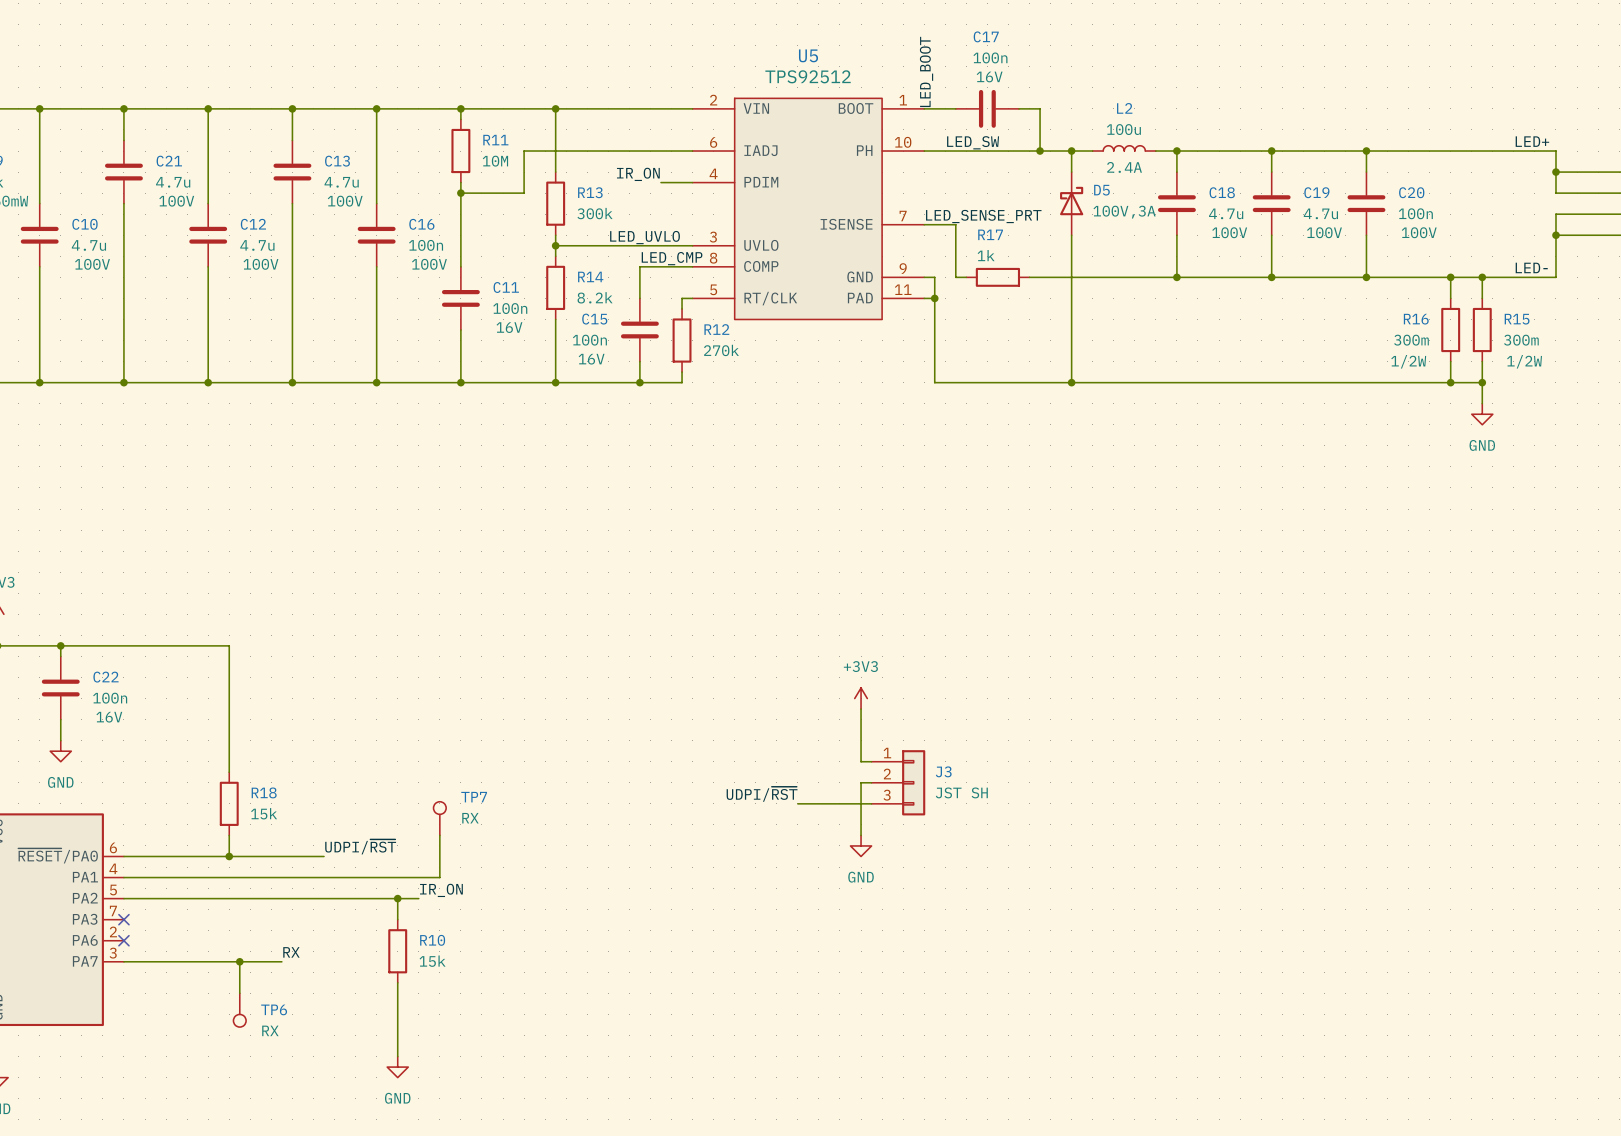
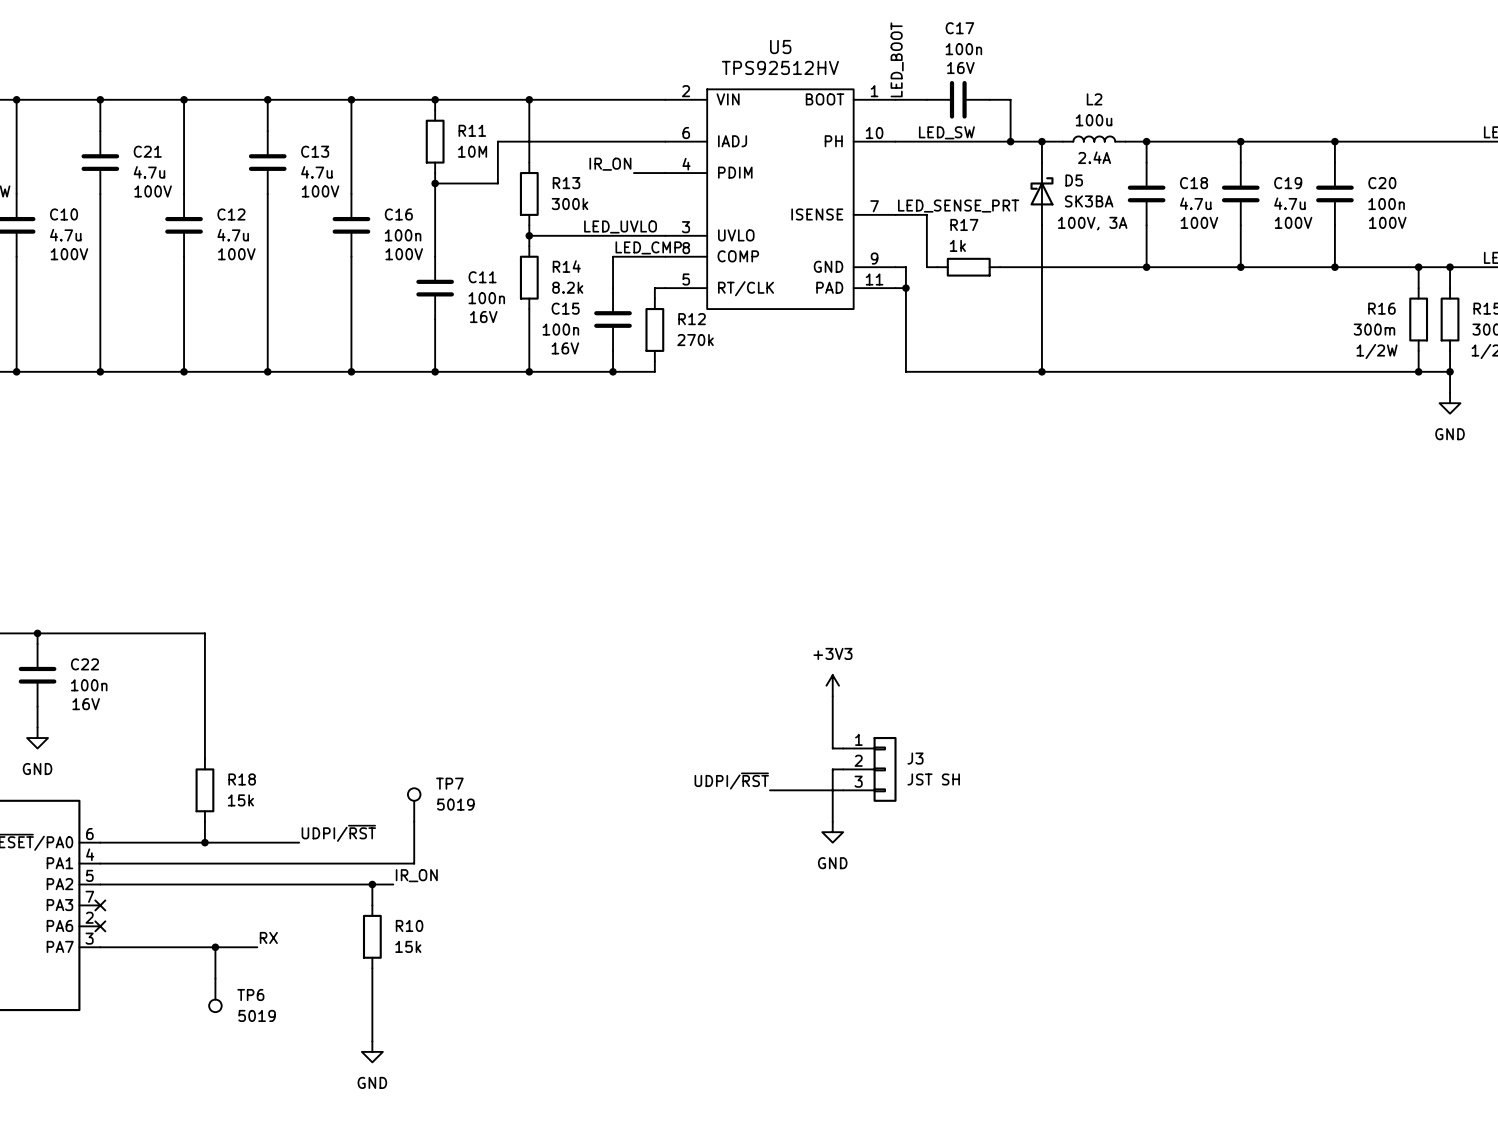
U5 value: TPS92512 (808, 76) -> TPS92512HV (780, 67)
D5 value: 100V,3A (1124, 212) -> SK3BA (1089, 201)
D5 text: none -> 100V, 3A (1092, 223)
TP7 value: RX (470, 818) -> 5019 (455, 804)
TP6 value: RX (270, 1030) -> 5019 (257, 1015)

